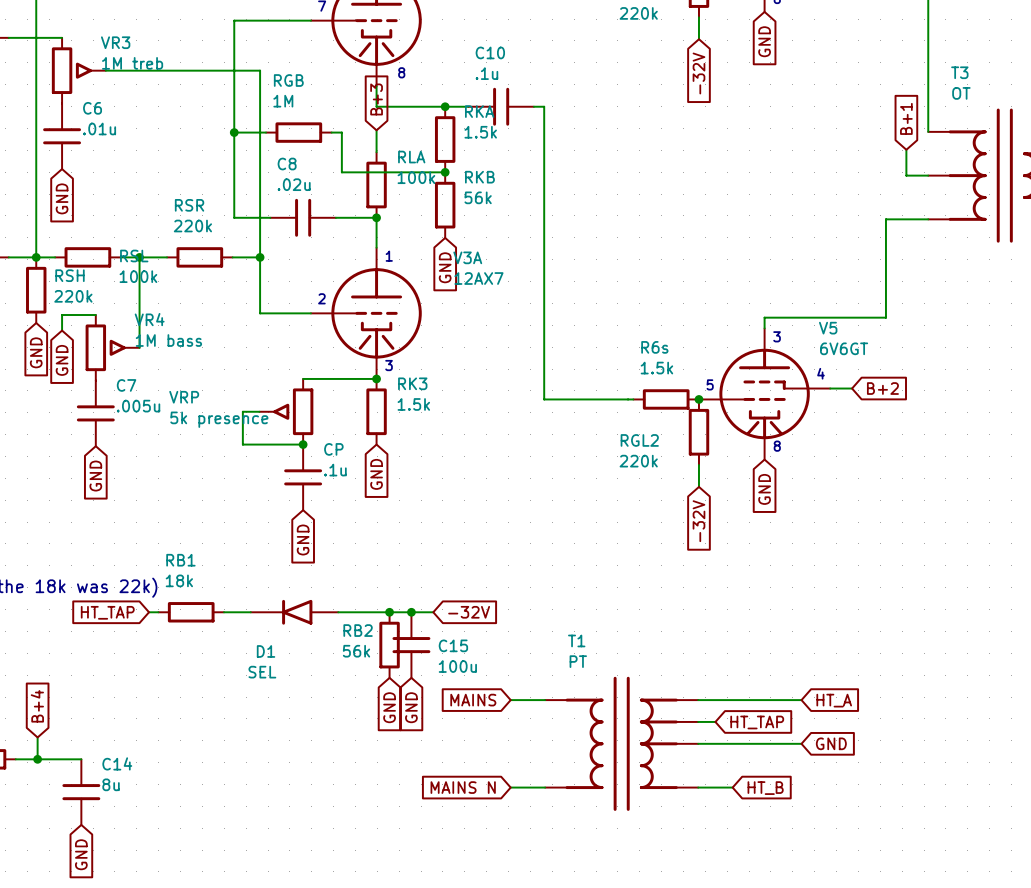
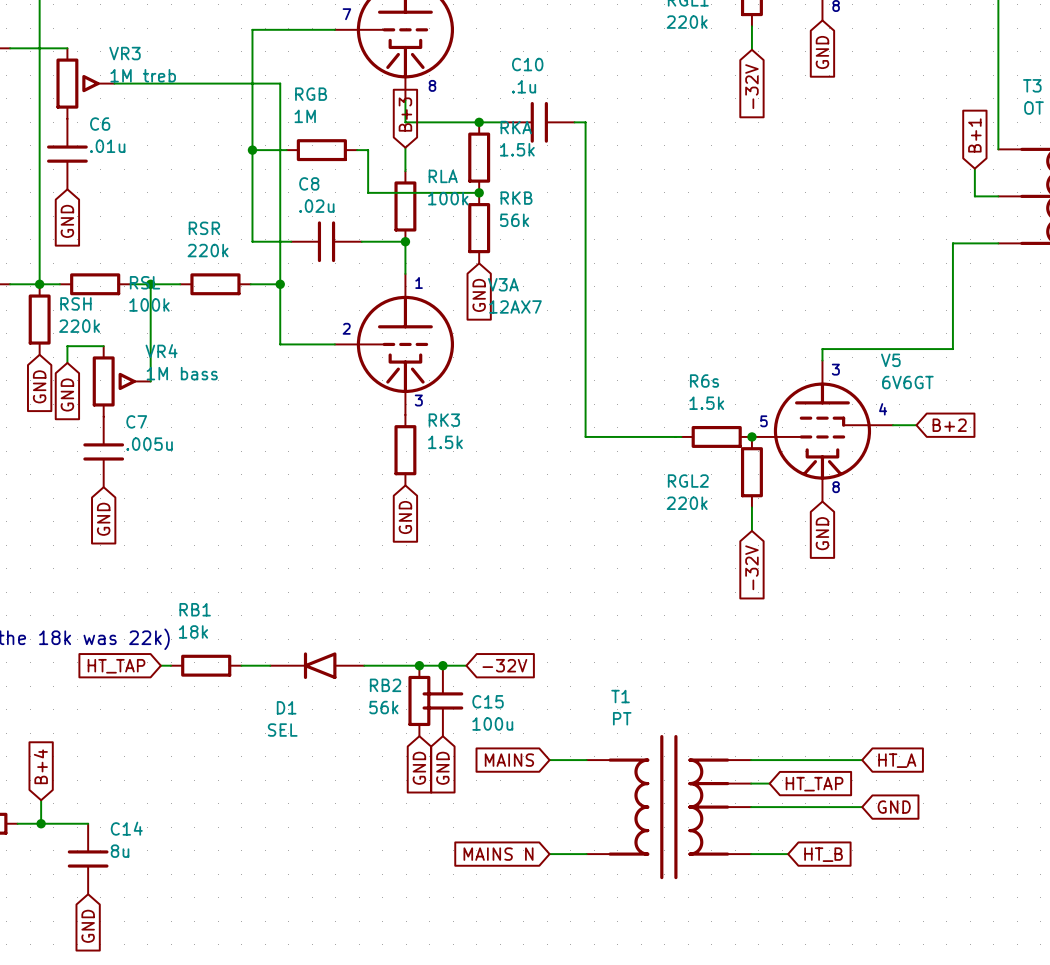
wire: (303, 378) (376, 378) -> none
junction: (376, 378) -> none
wire: (259, 411) (242, 411) (242, 444) (303, 444) -> none
VRP: 5k presence (286, 411) -> none
junction: (303, 444) -> none
CP: .1u (303, 477) -> none
global label: GND (303, 540) -> none

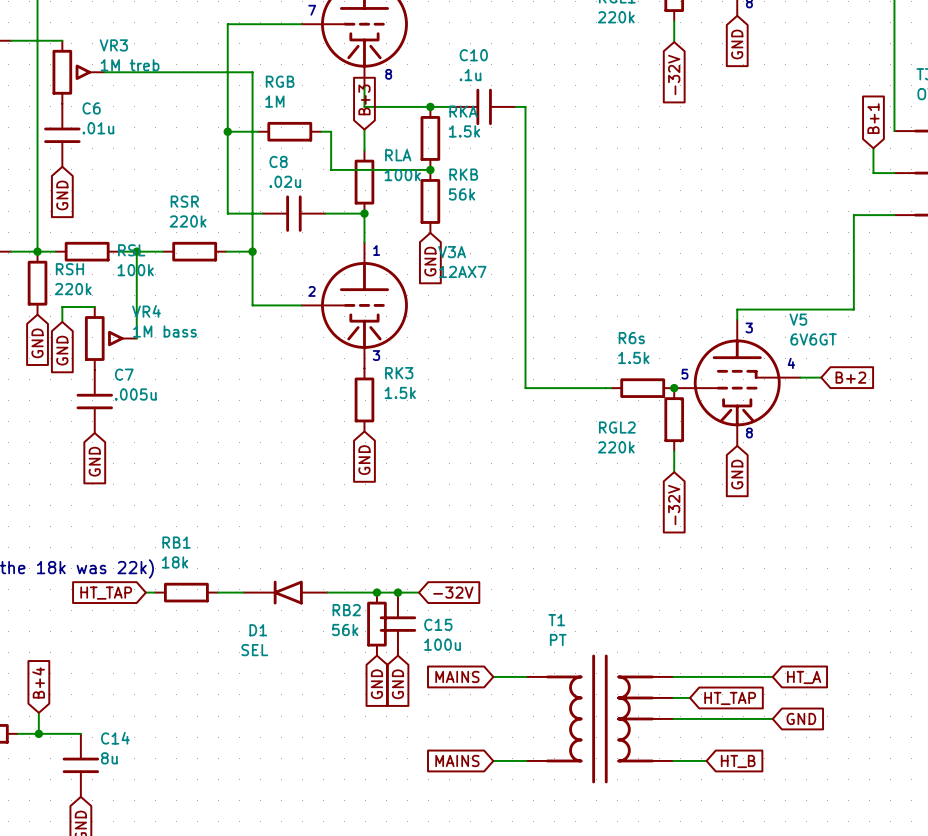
global label: MAINS N (498, 854) -> MAINS (457, 760)

